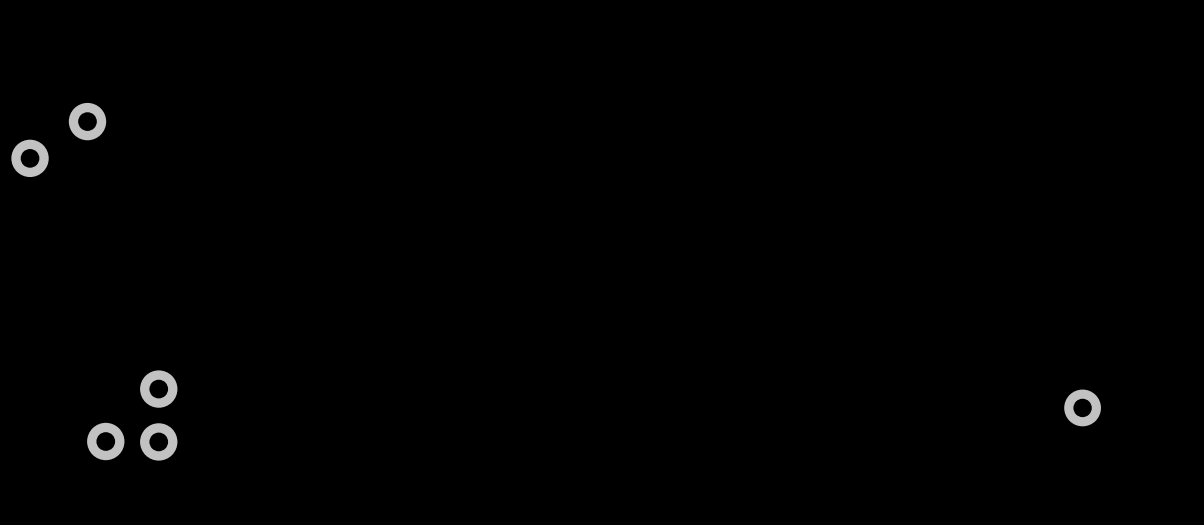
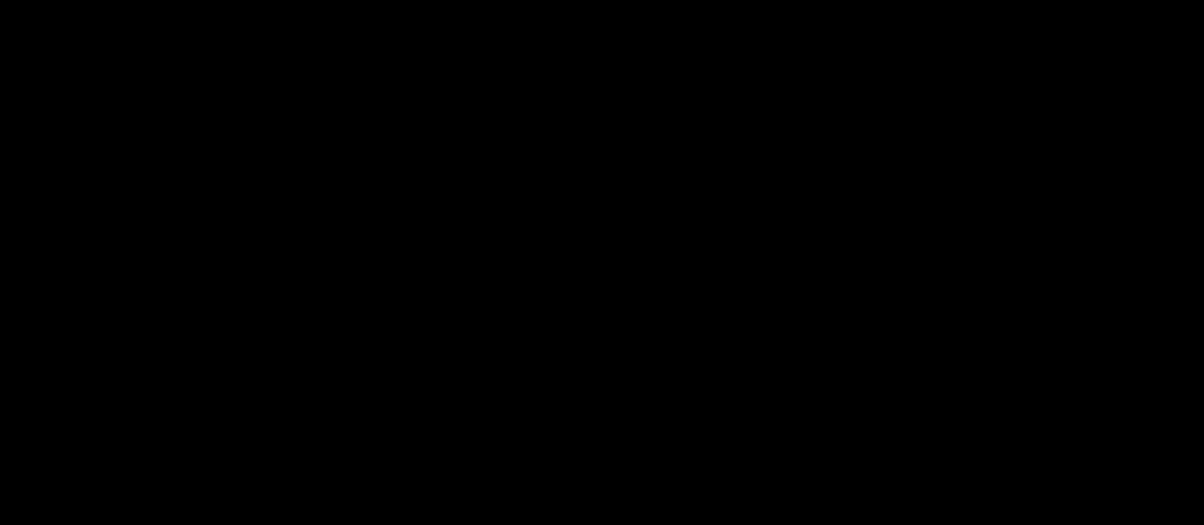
via: (87, 121) -> none
via: (30, 158) -> none
via: (158, 389) -> none
via: (1082, 407) -> none
via: (105, 441) -> none
via: (158, 441) -> none

